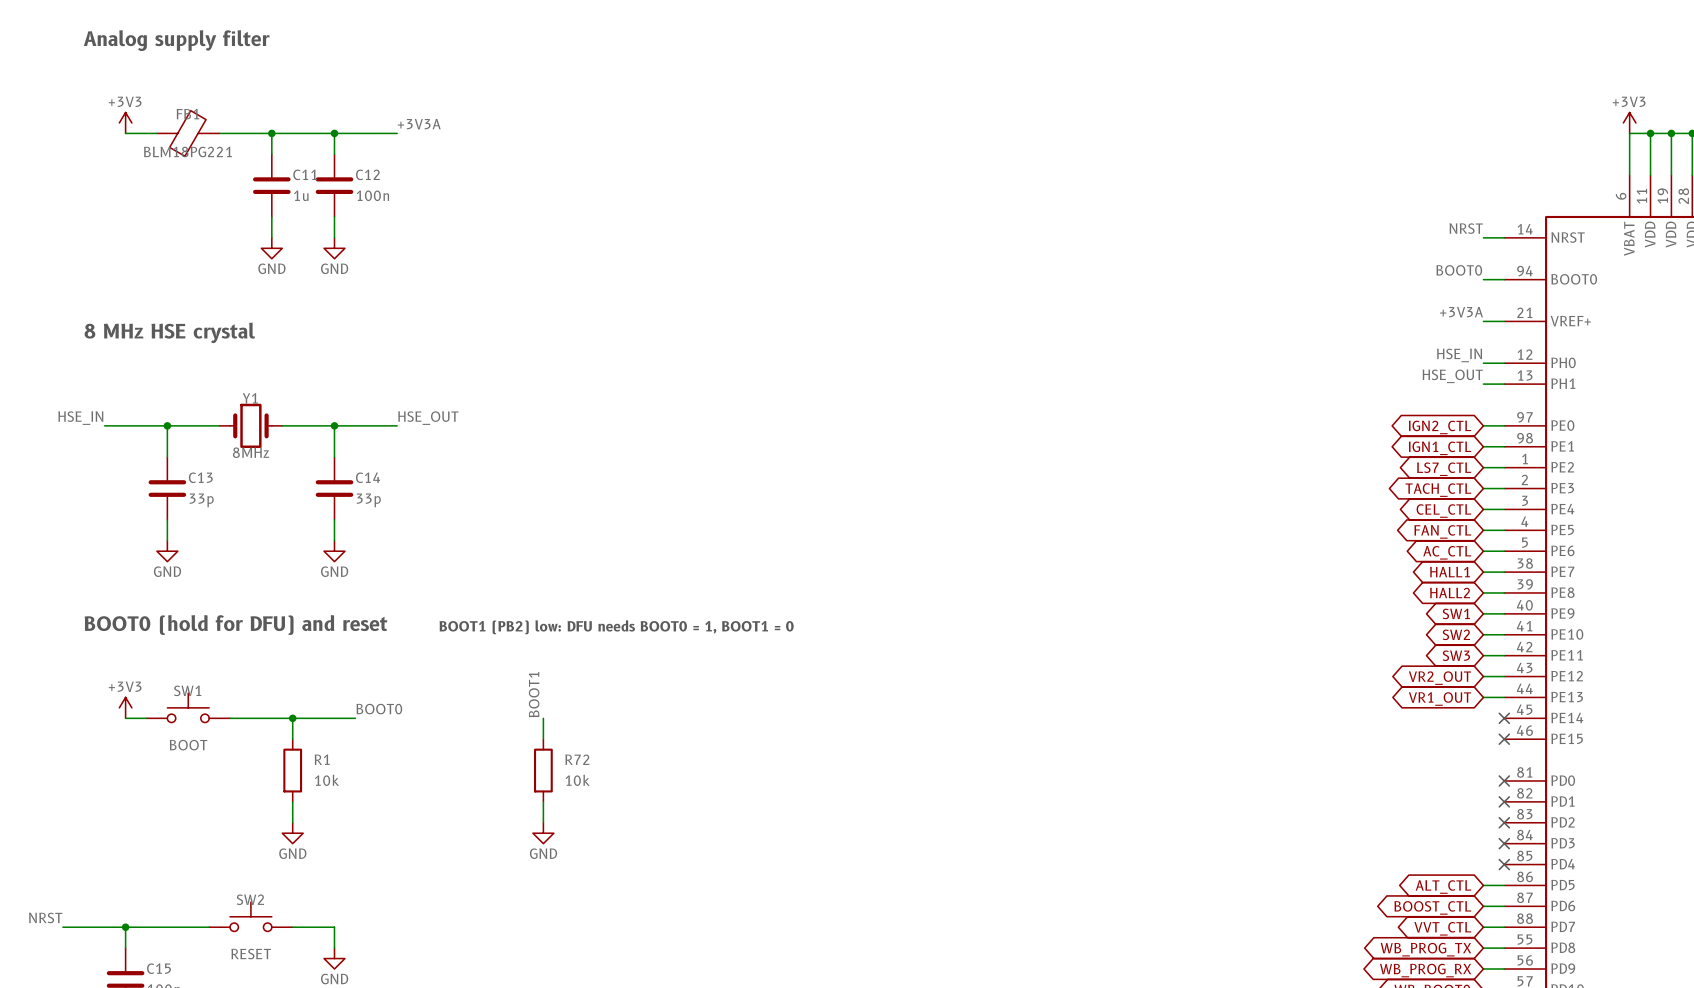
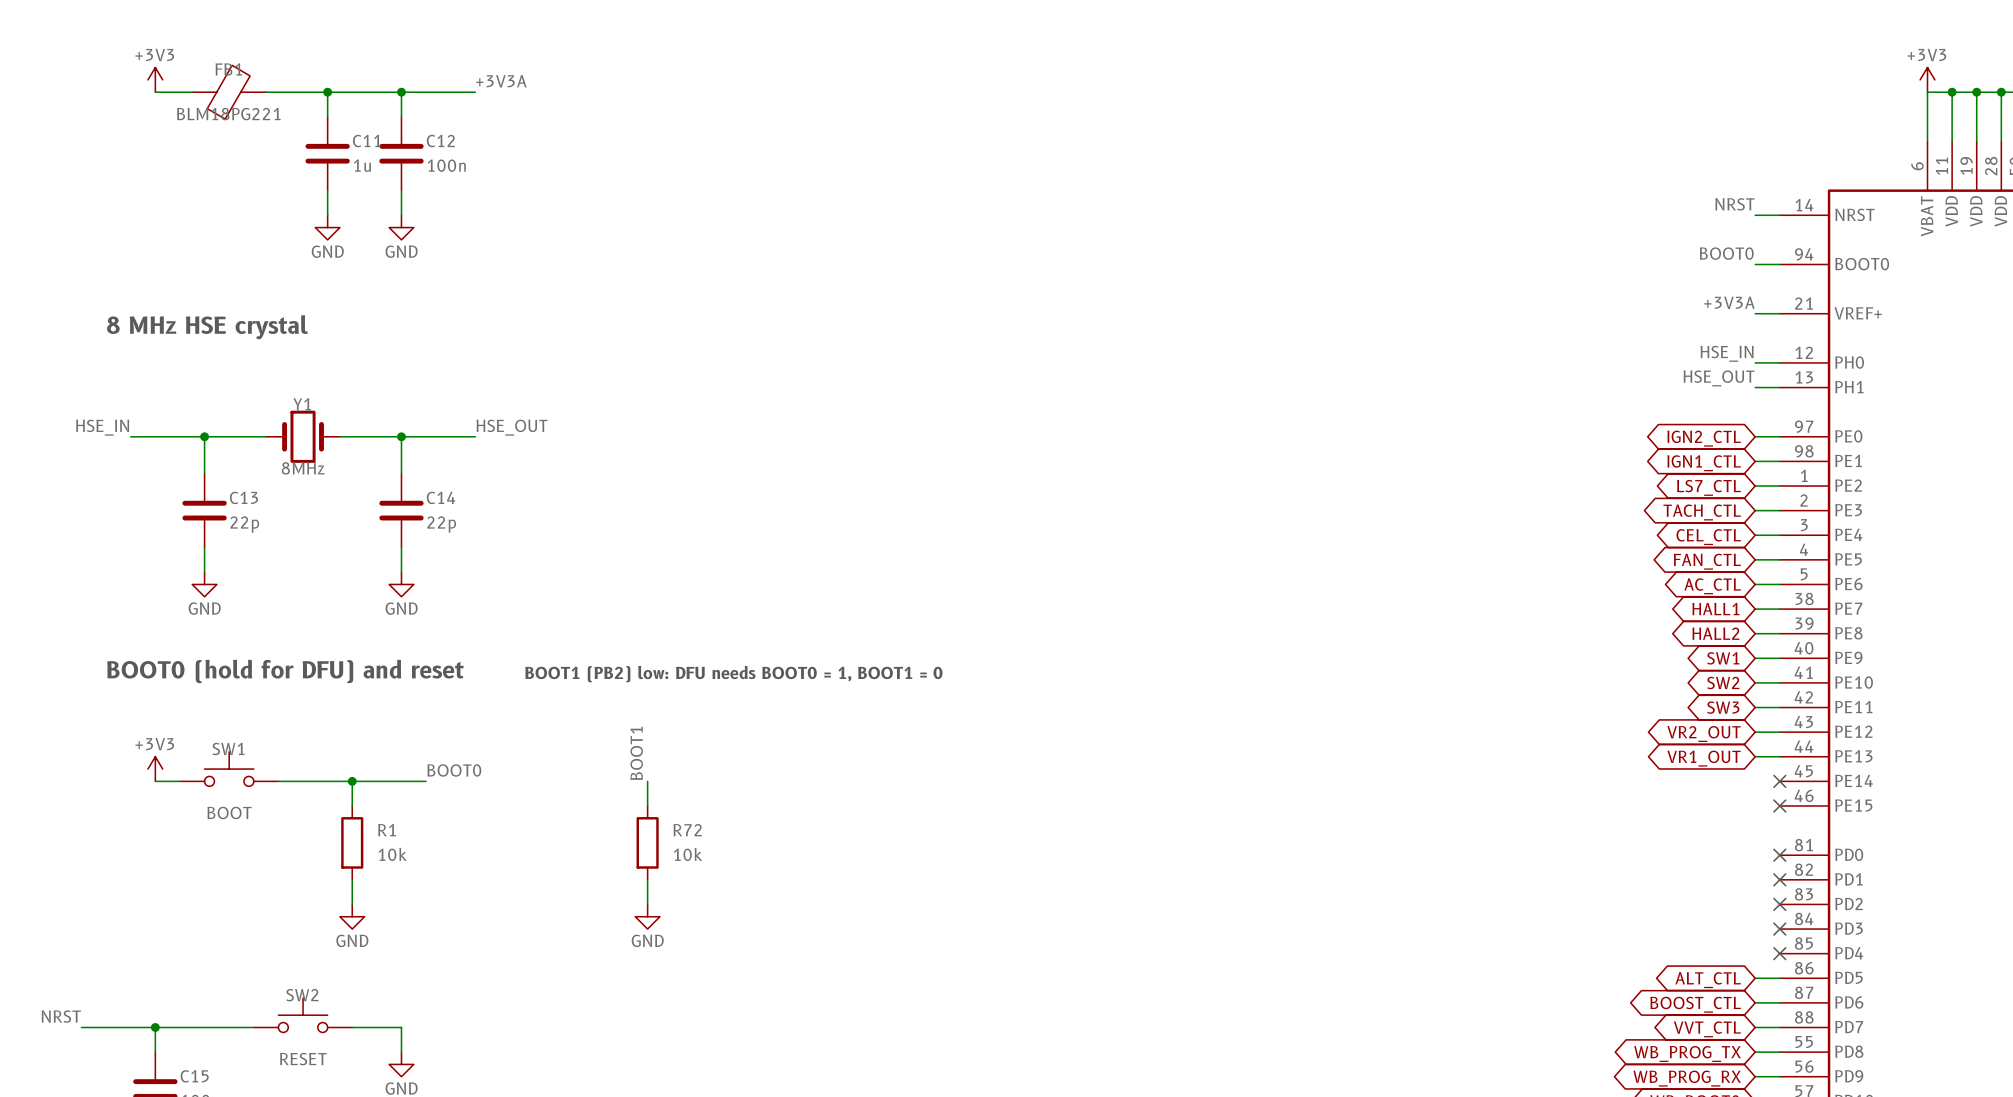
C13 value: 33p (201, 500) -> 22p (244, 524)
C14 value: 33p (368, 500) -> 22p (441, 524)

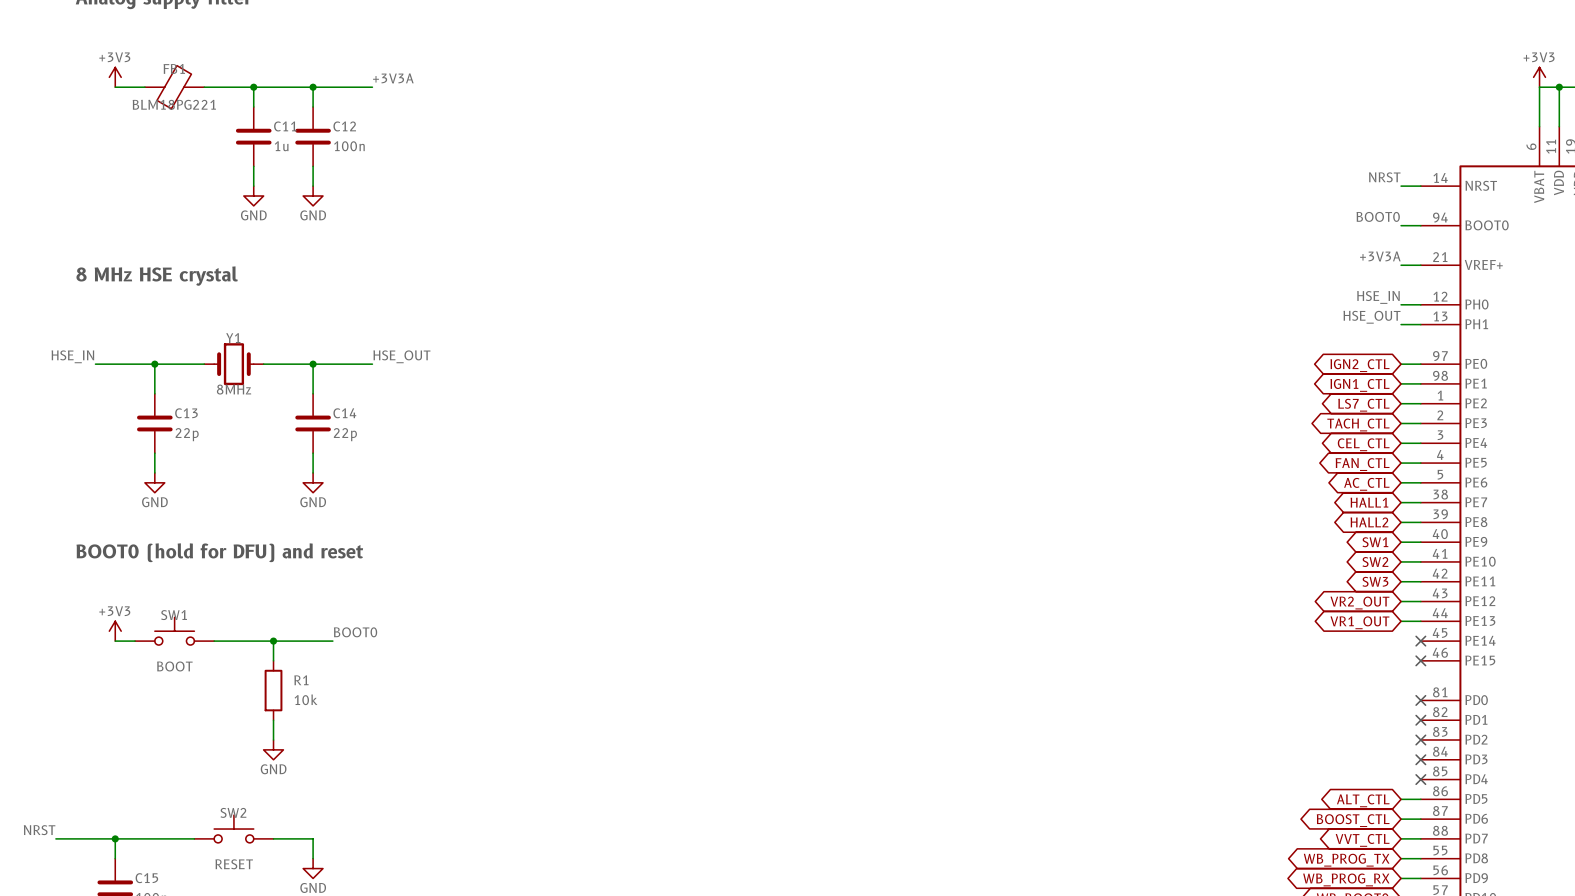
text: BOOT1 (PB2) low: DFU needs BOOT0 = 1, BOOT1 = 0 (733, 674) -> none
label: BOOT1 (636, 753) -> none
wire: (647, 781) (647, 805) -> none
R72: 10k (647, 842) -> none
wire: (647, 879) (647, 904) -> none
power symbol: GND (647, 916) -> none

